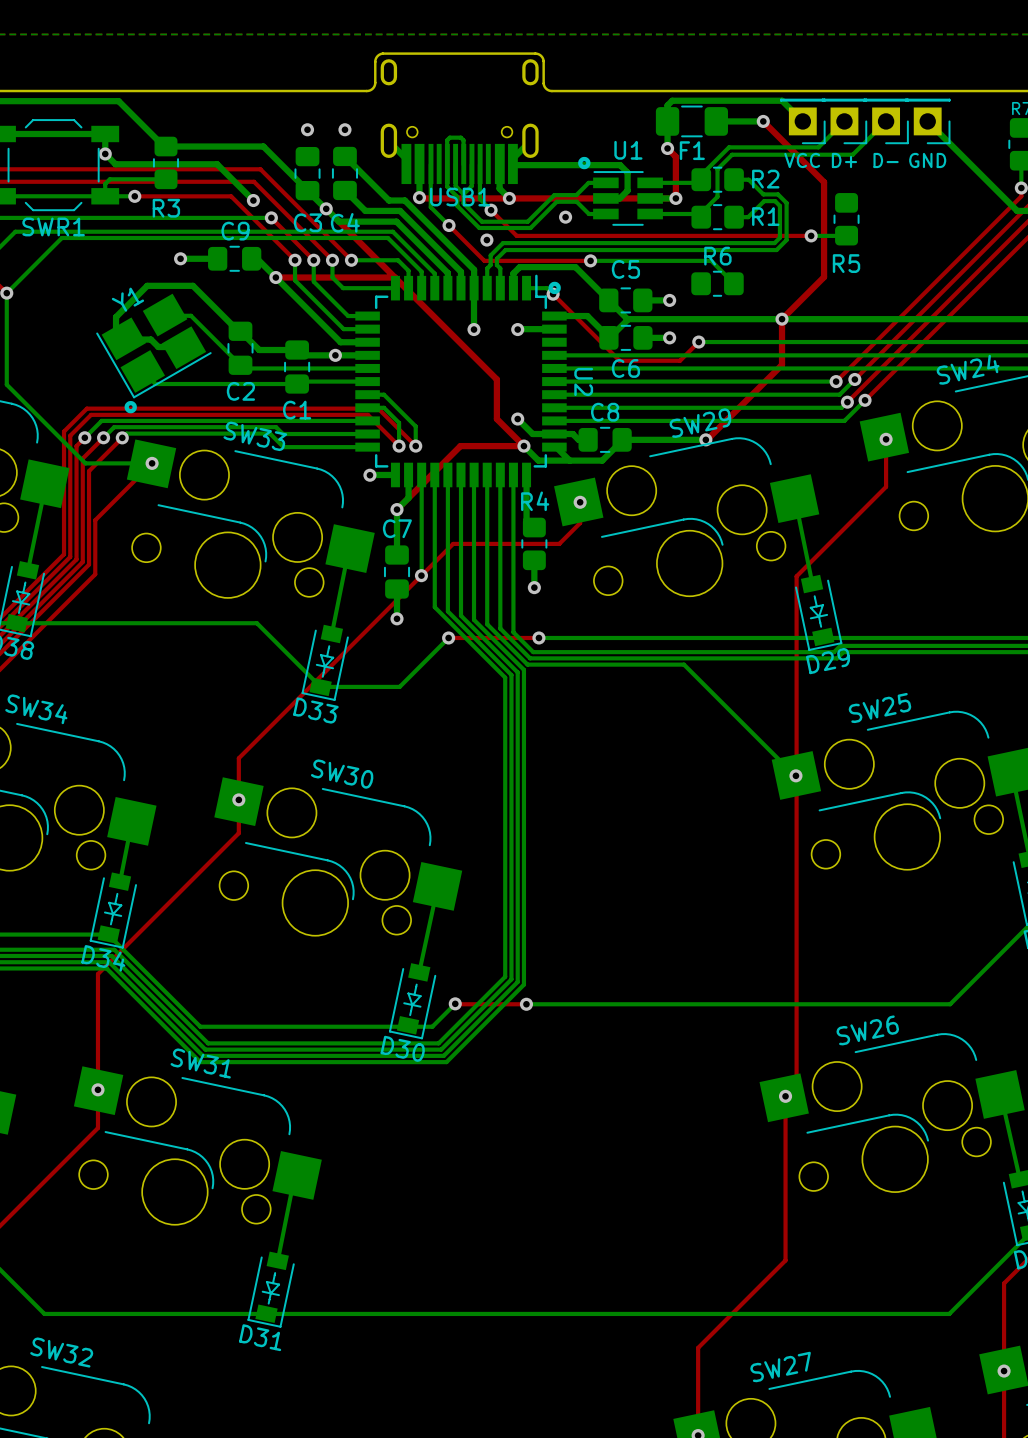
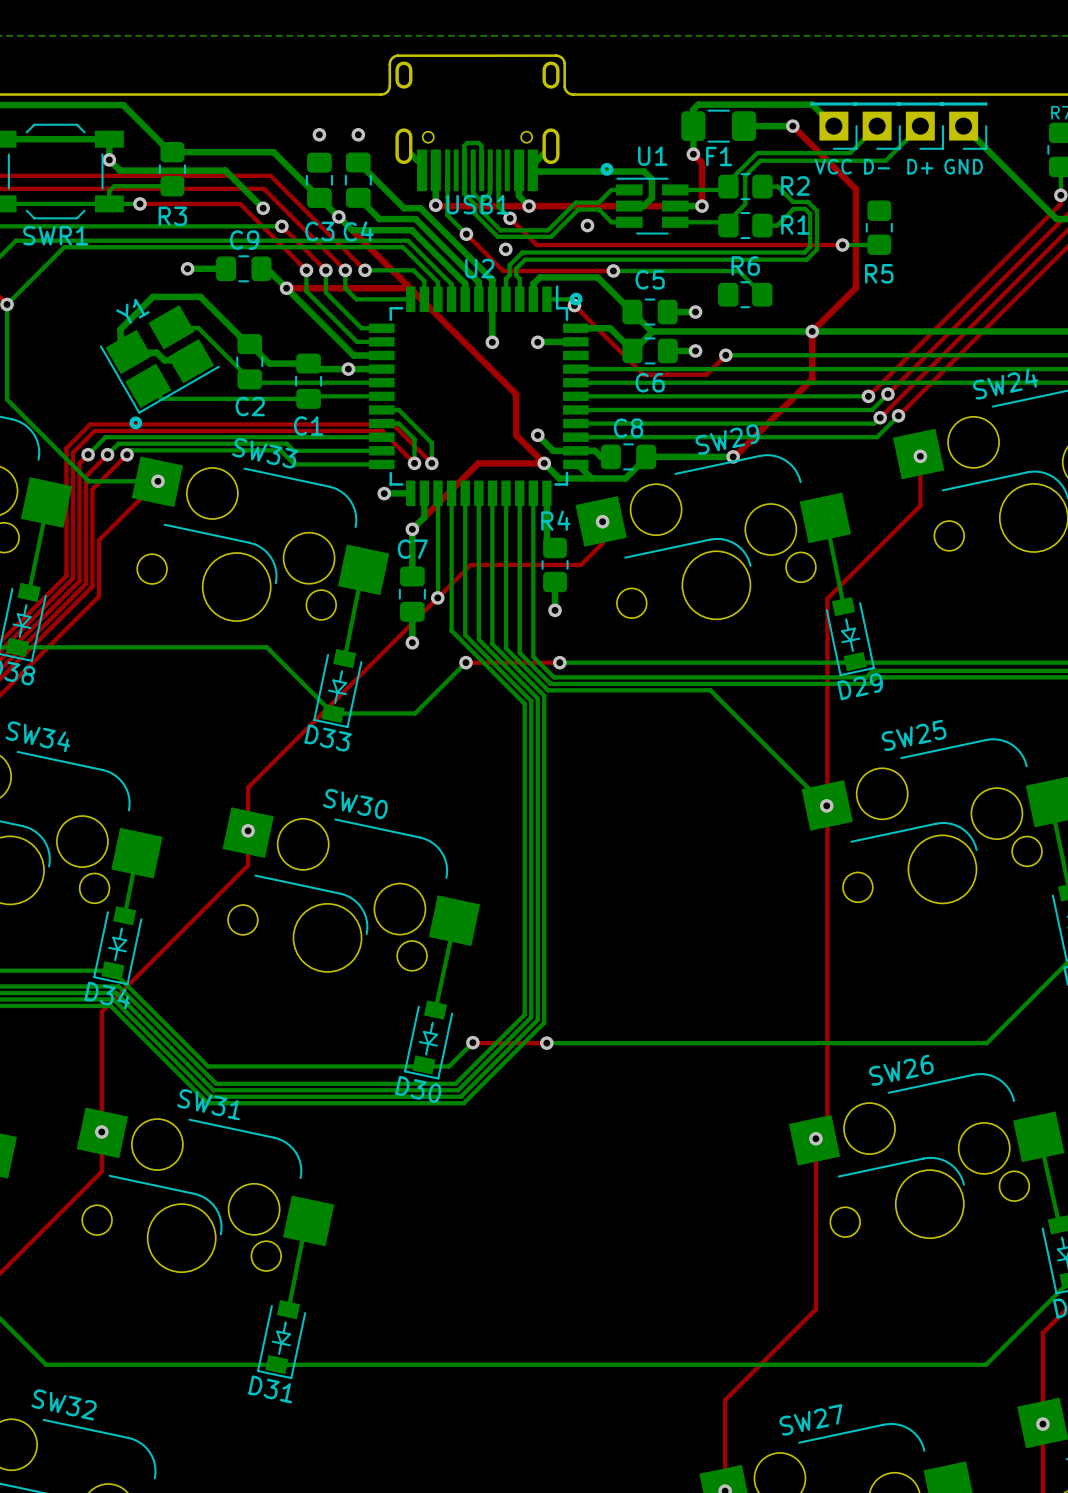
part value: D+ (844, 160) -> D- (877, 166)
part value: D- (886, 160) -> D+ (920, 166)
U2 name rotation: 0° (583, 381) -> 90° counterclockwise (479, 268)
U2 name position: U2 (583, 381) -> U2 (479, 268)

